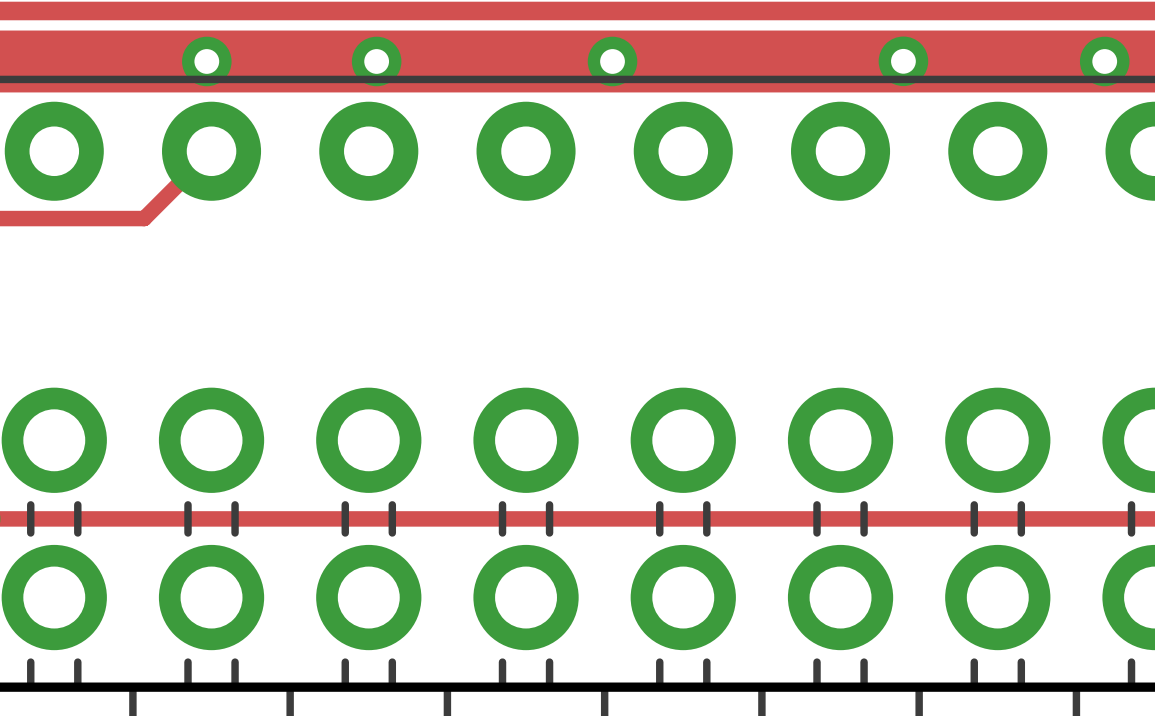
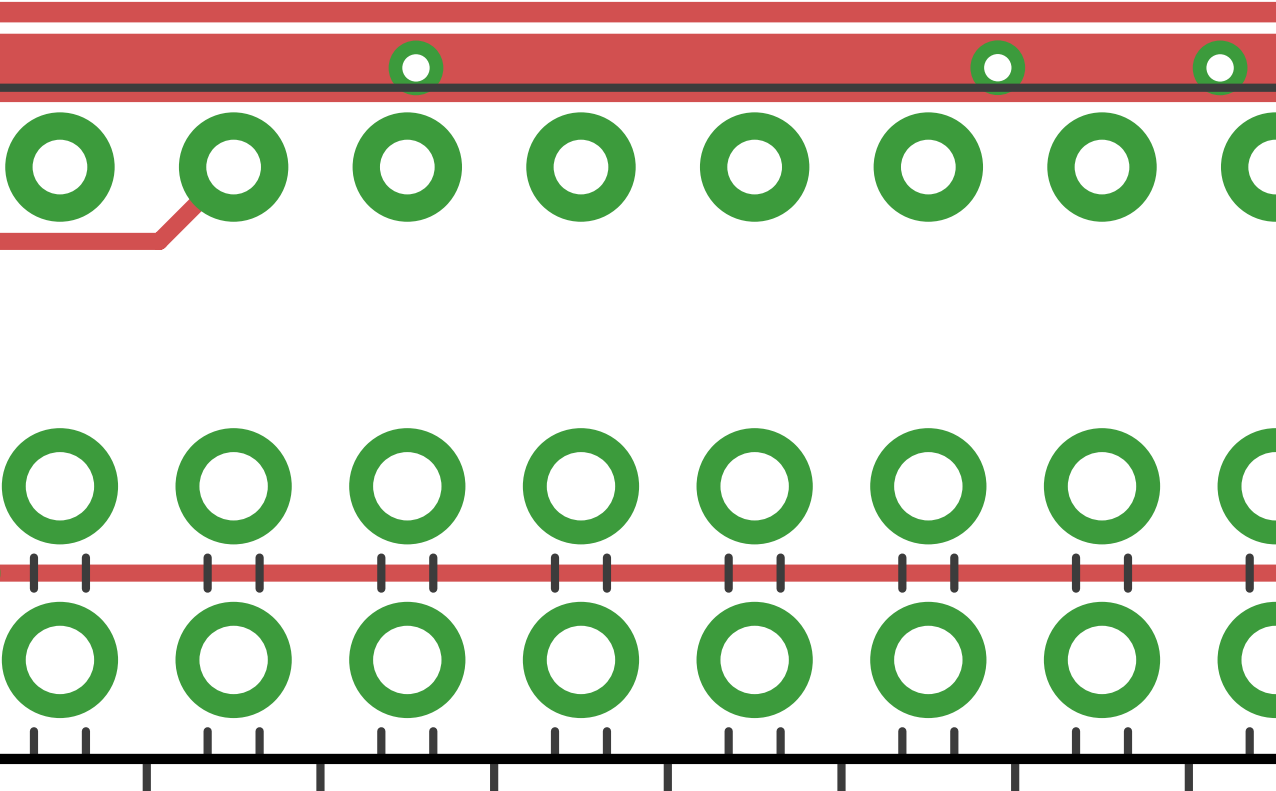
via: (206, 61) -> none
via: (612, 61) -> none

